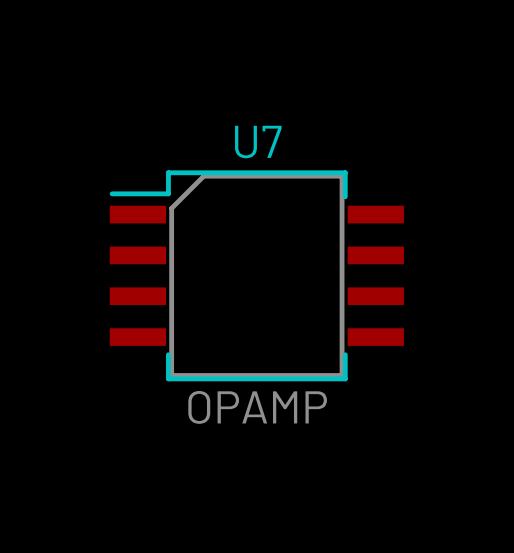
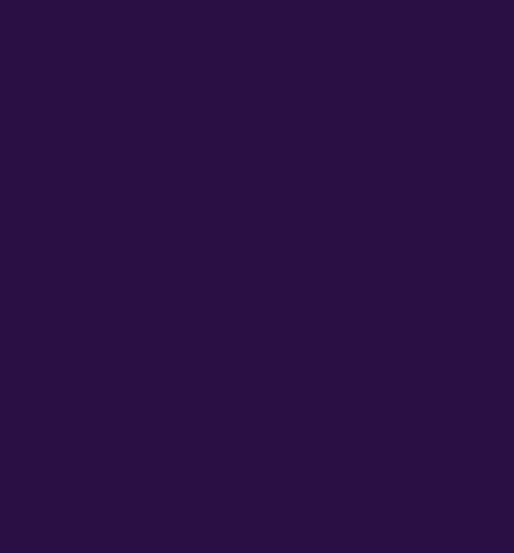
U7: OPAMP (256, 275) -> none

